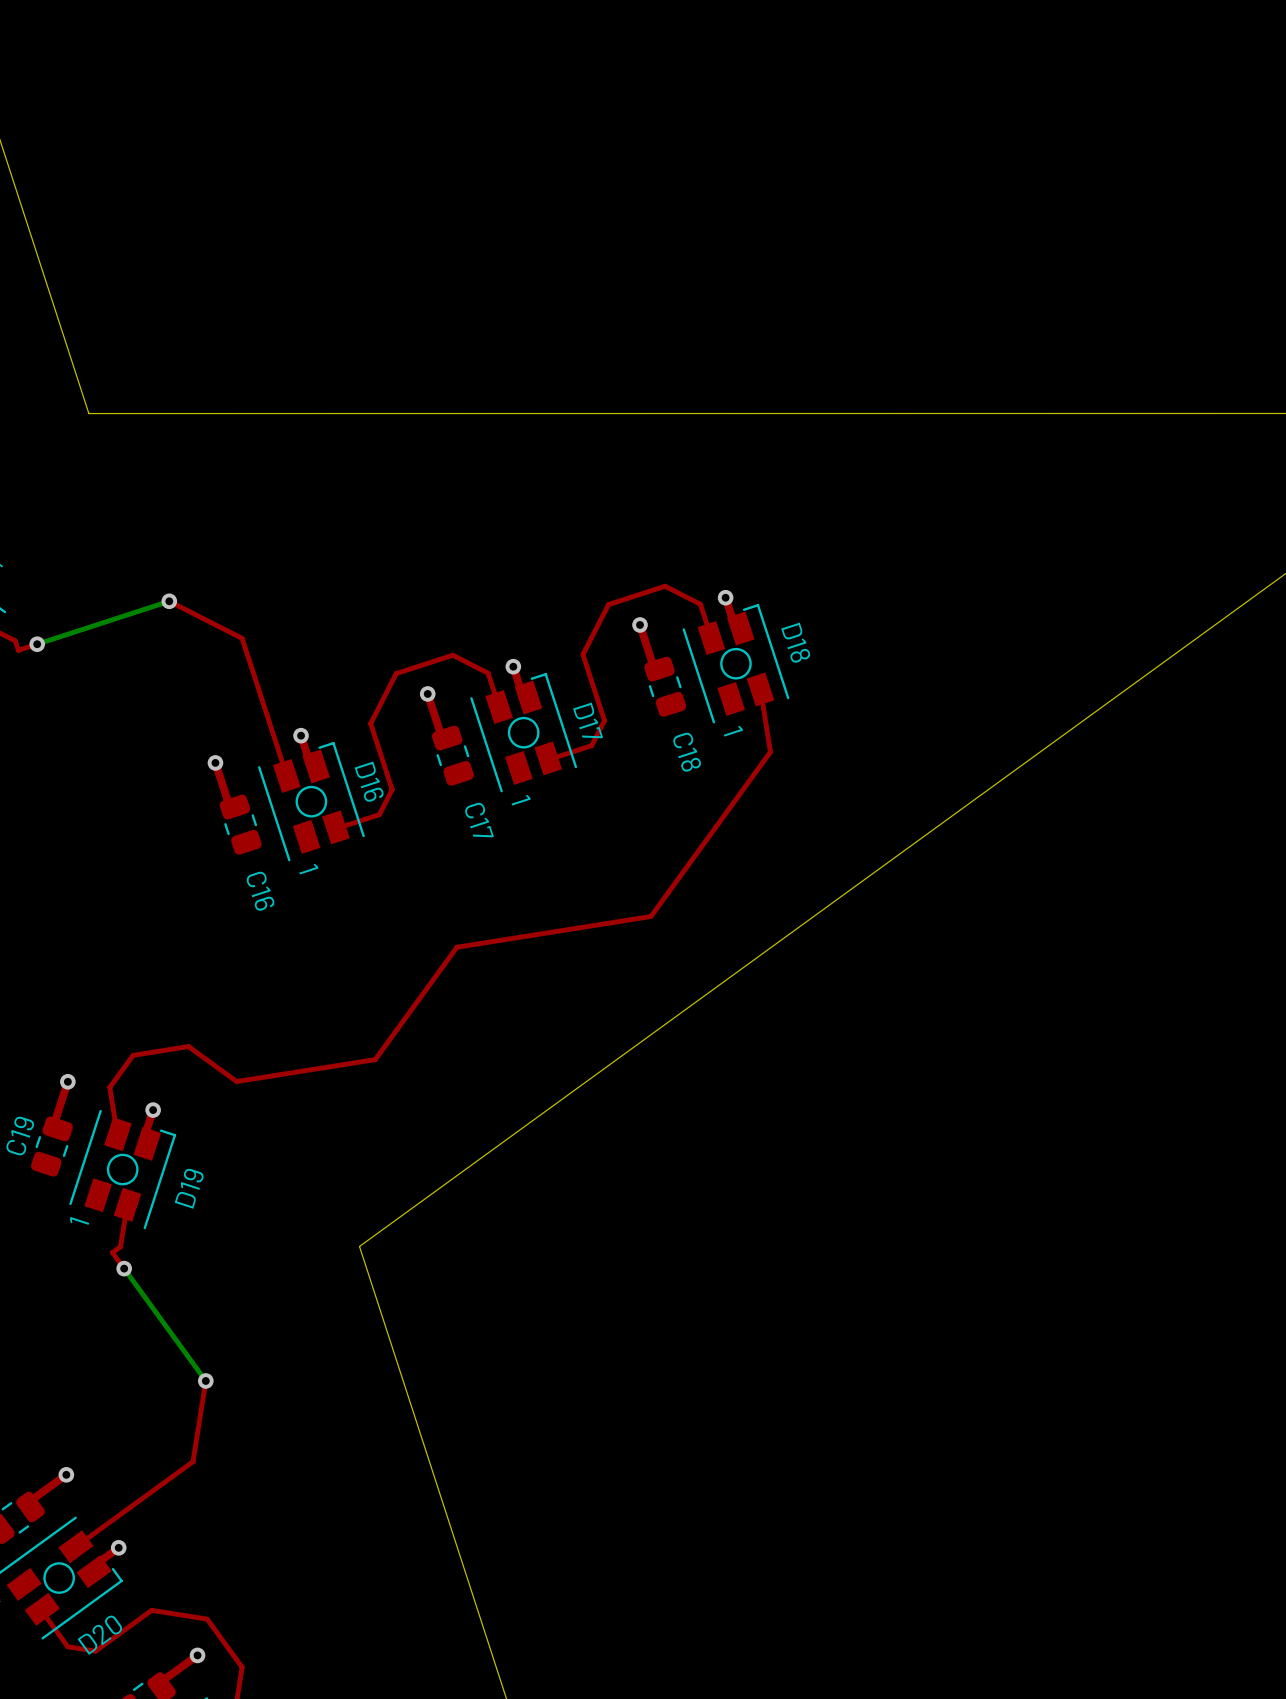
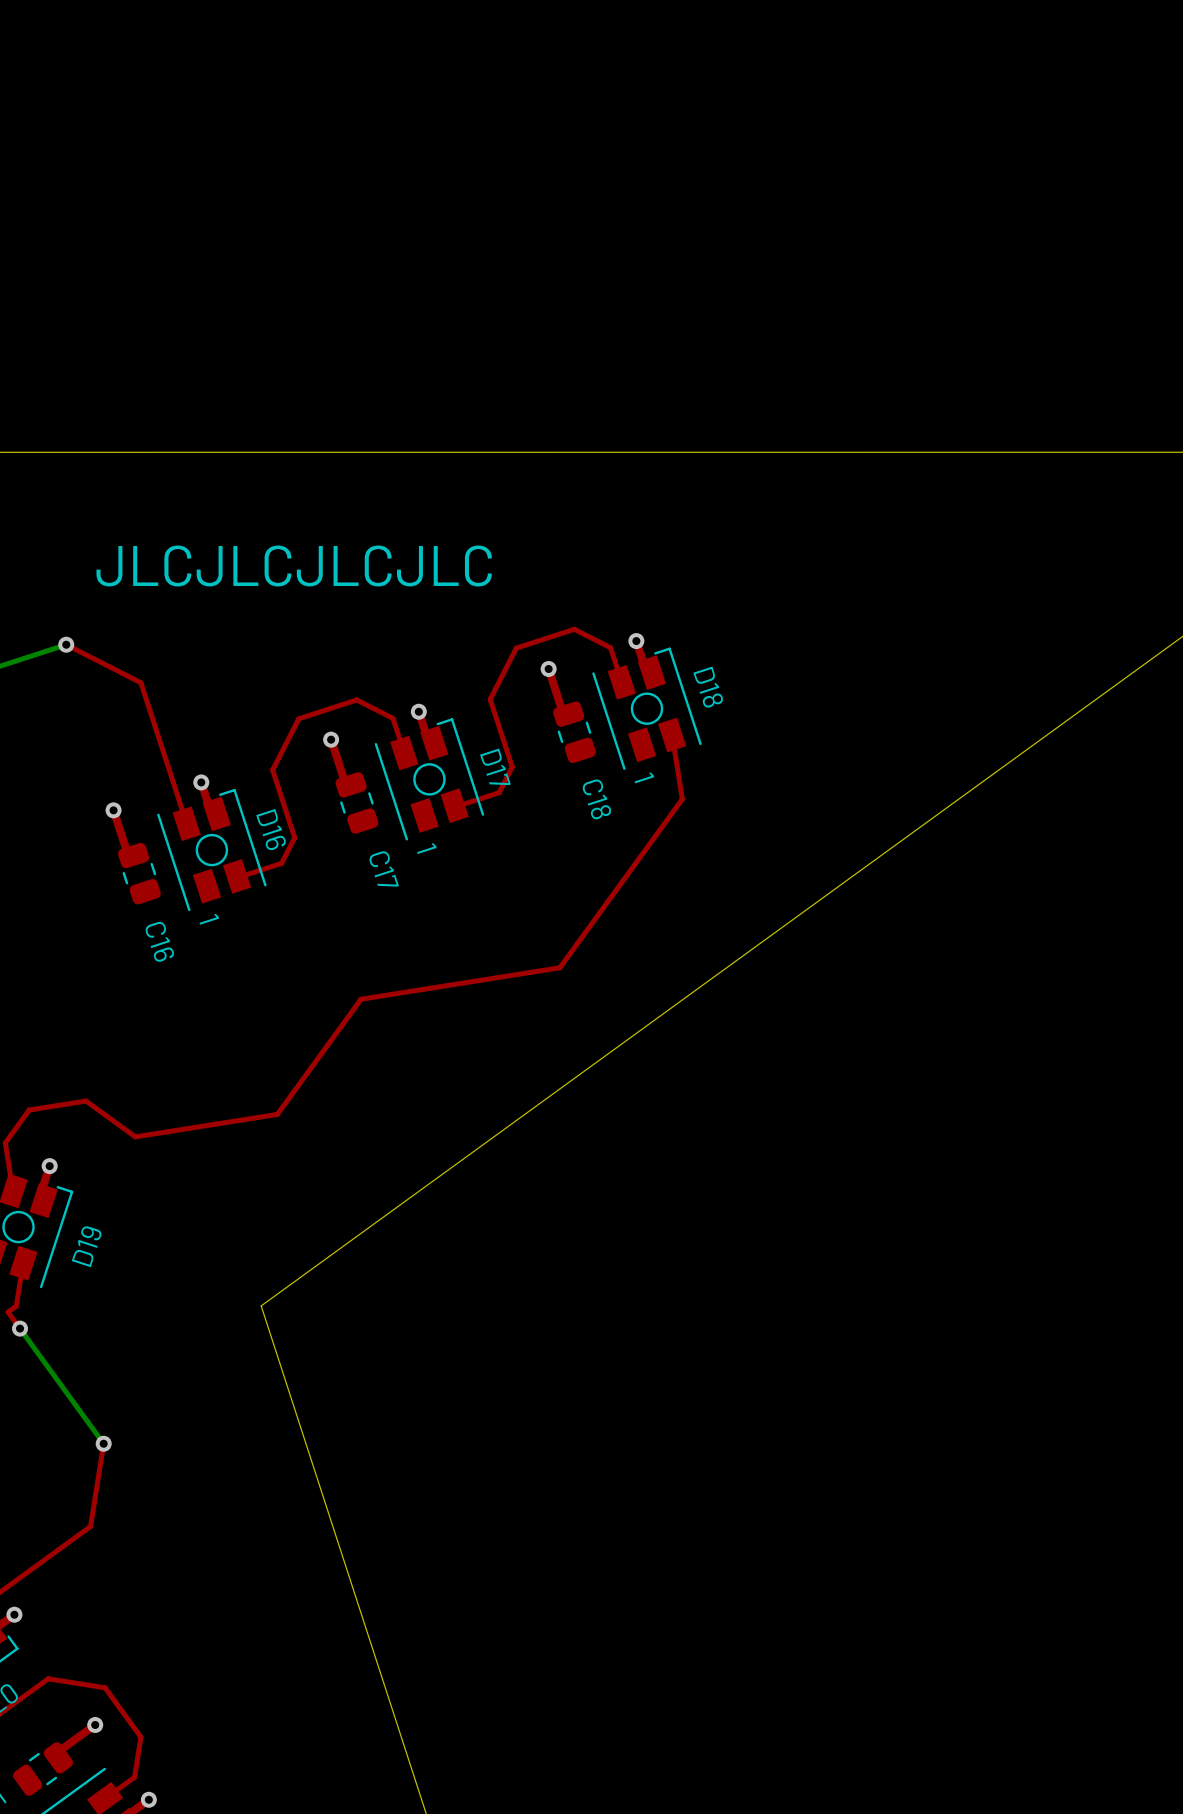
text: none -> JLCJLCJLCJLC (294, 566)

